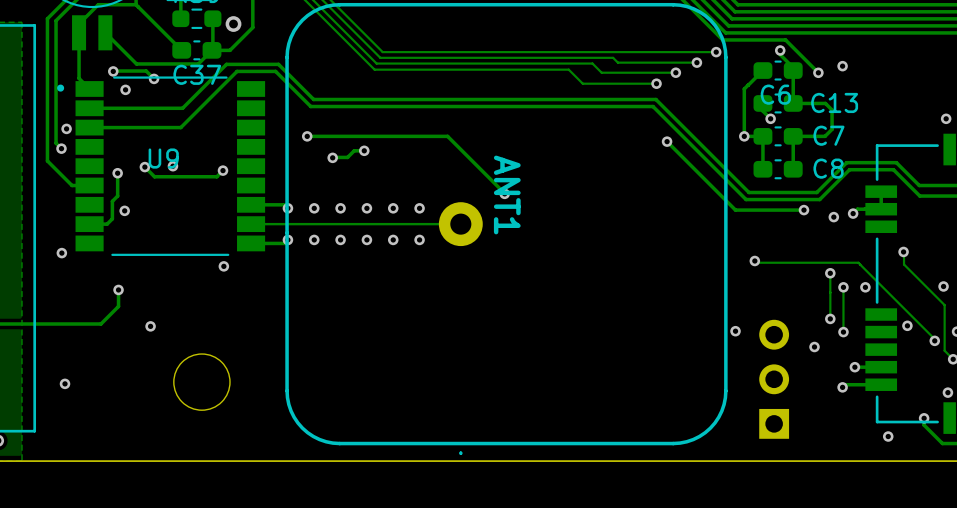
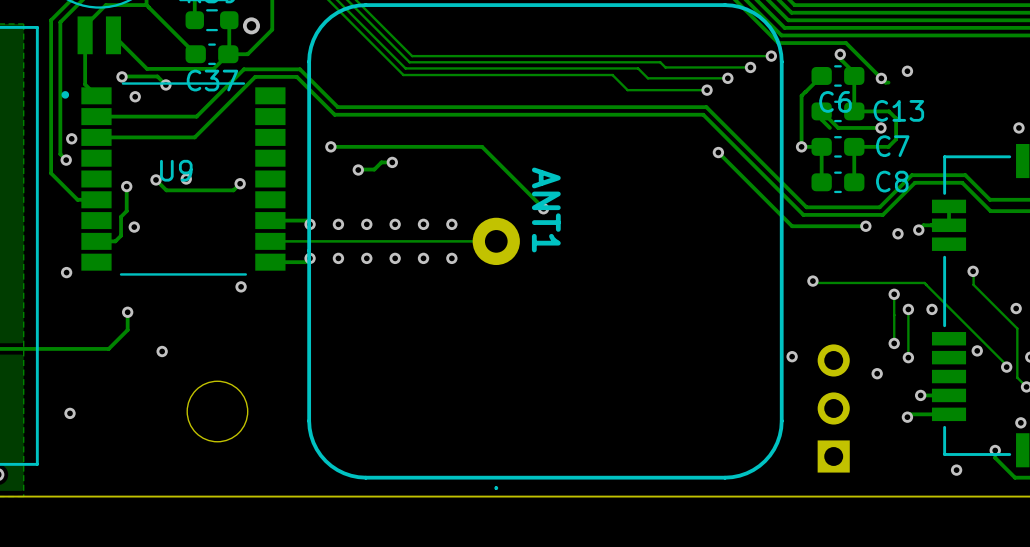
track: none -> (881, 78) (888, 82)
track: none -> (821, 111) (838, 127) (880, 127)
via position: (770, 118) -> (880, 127)

